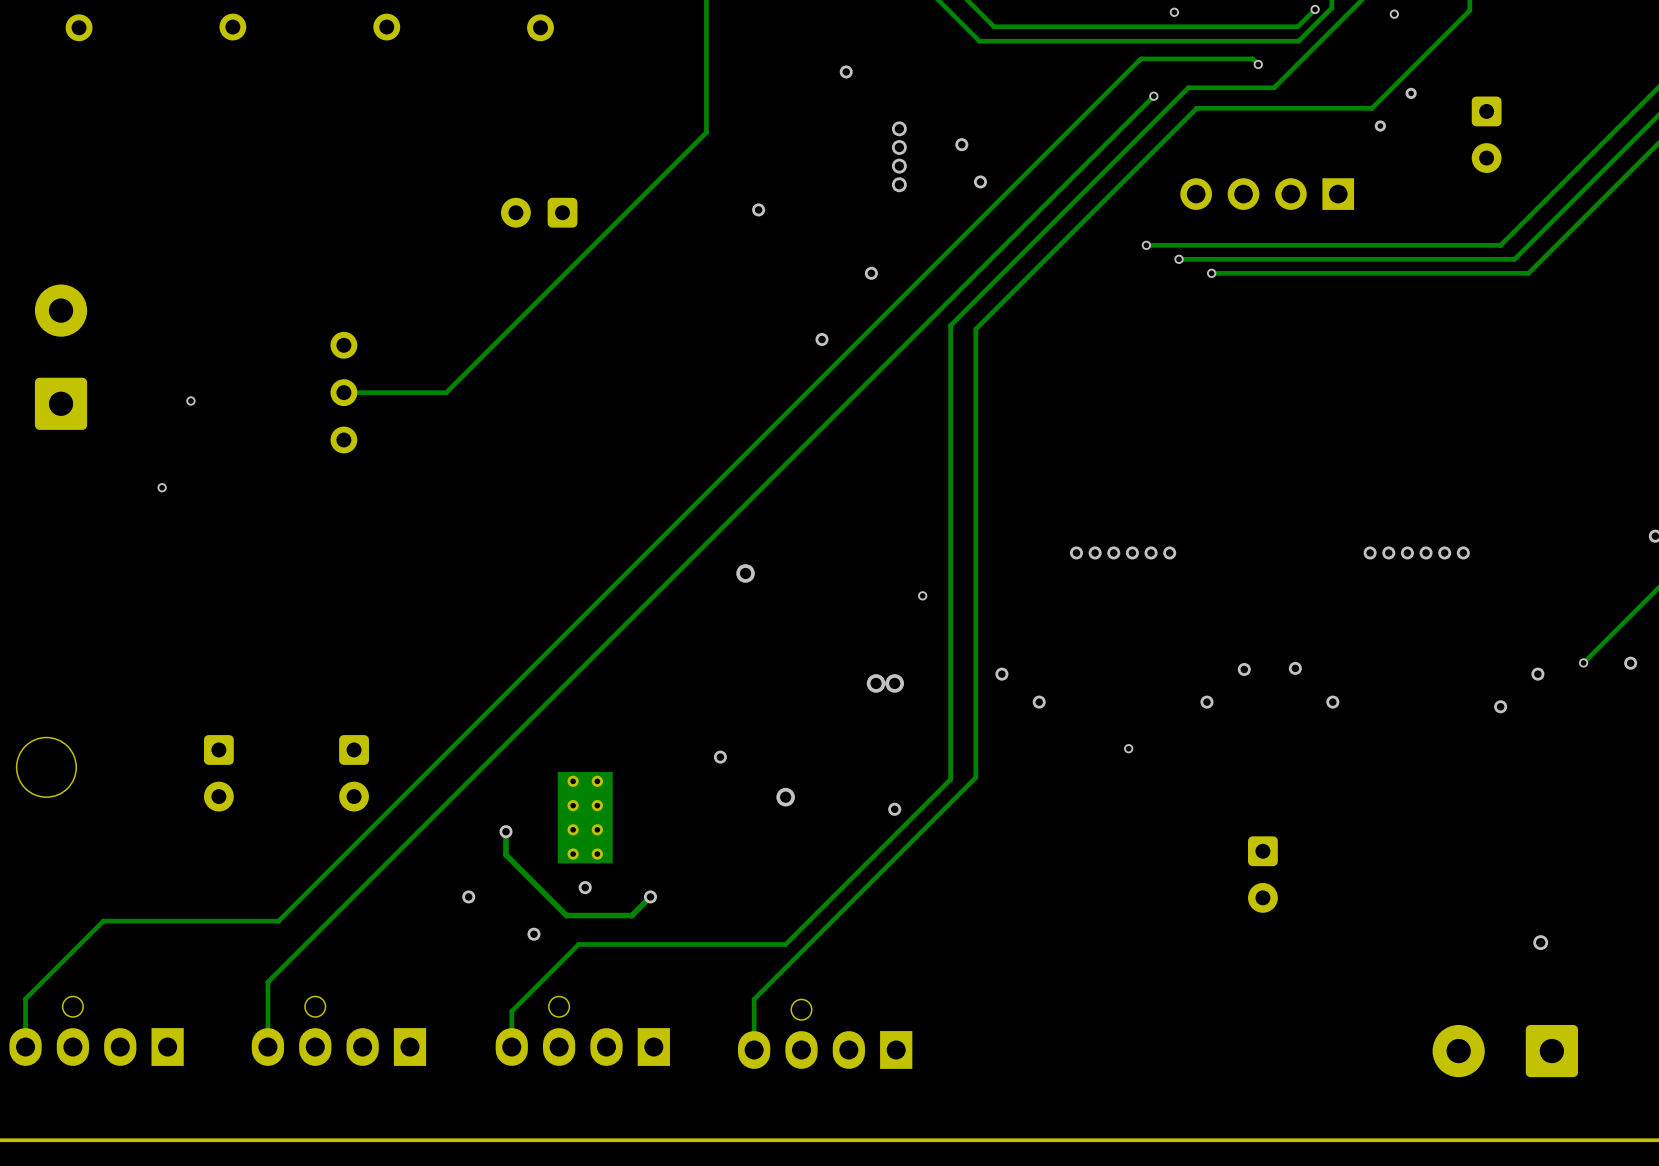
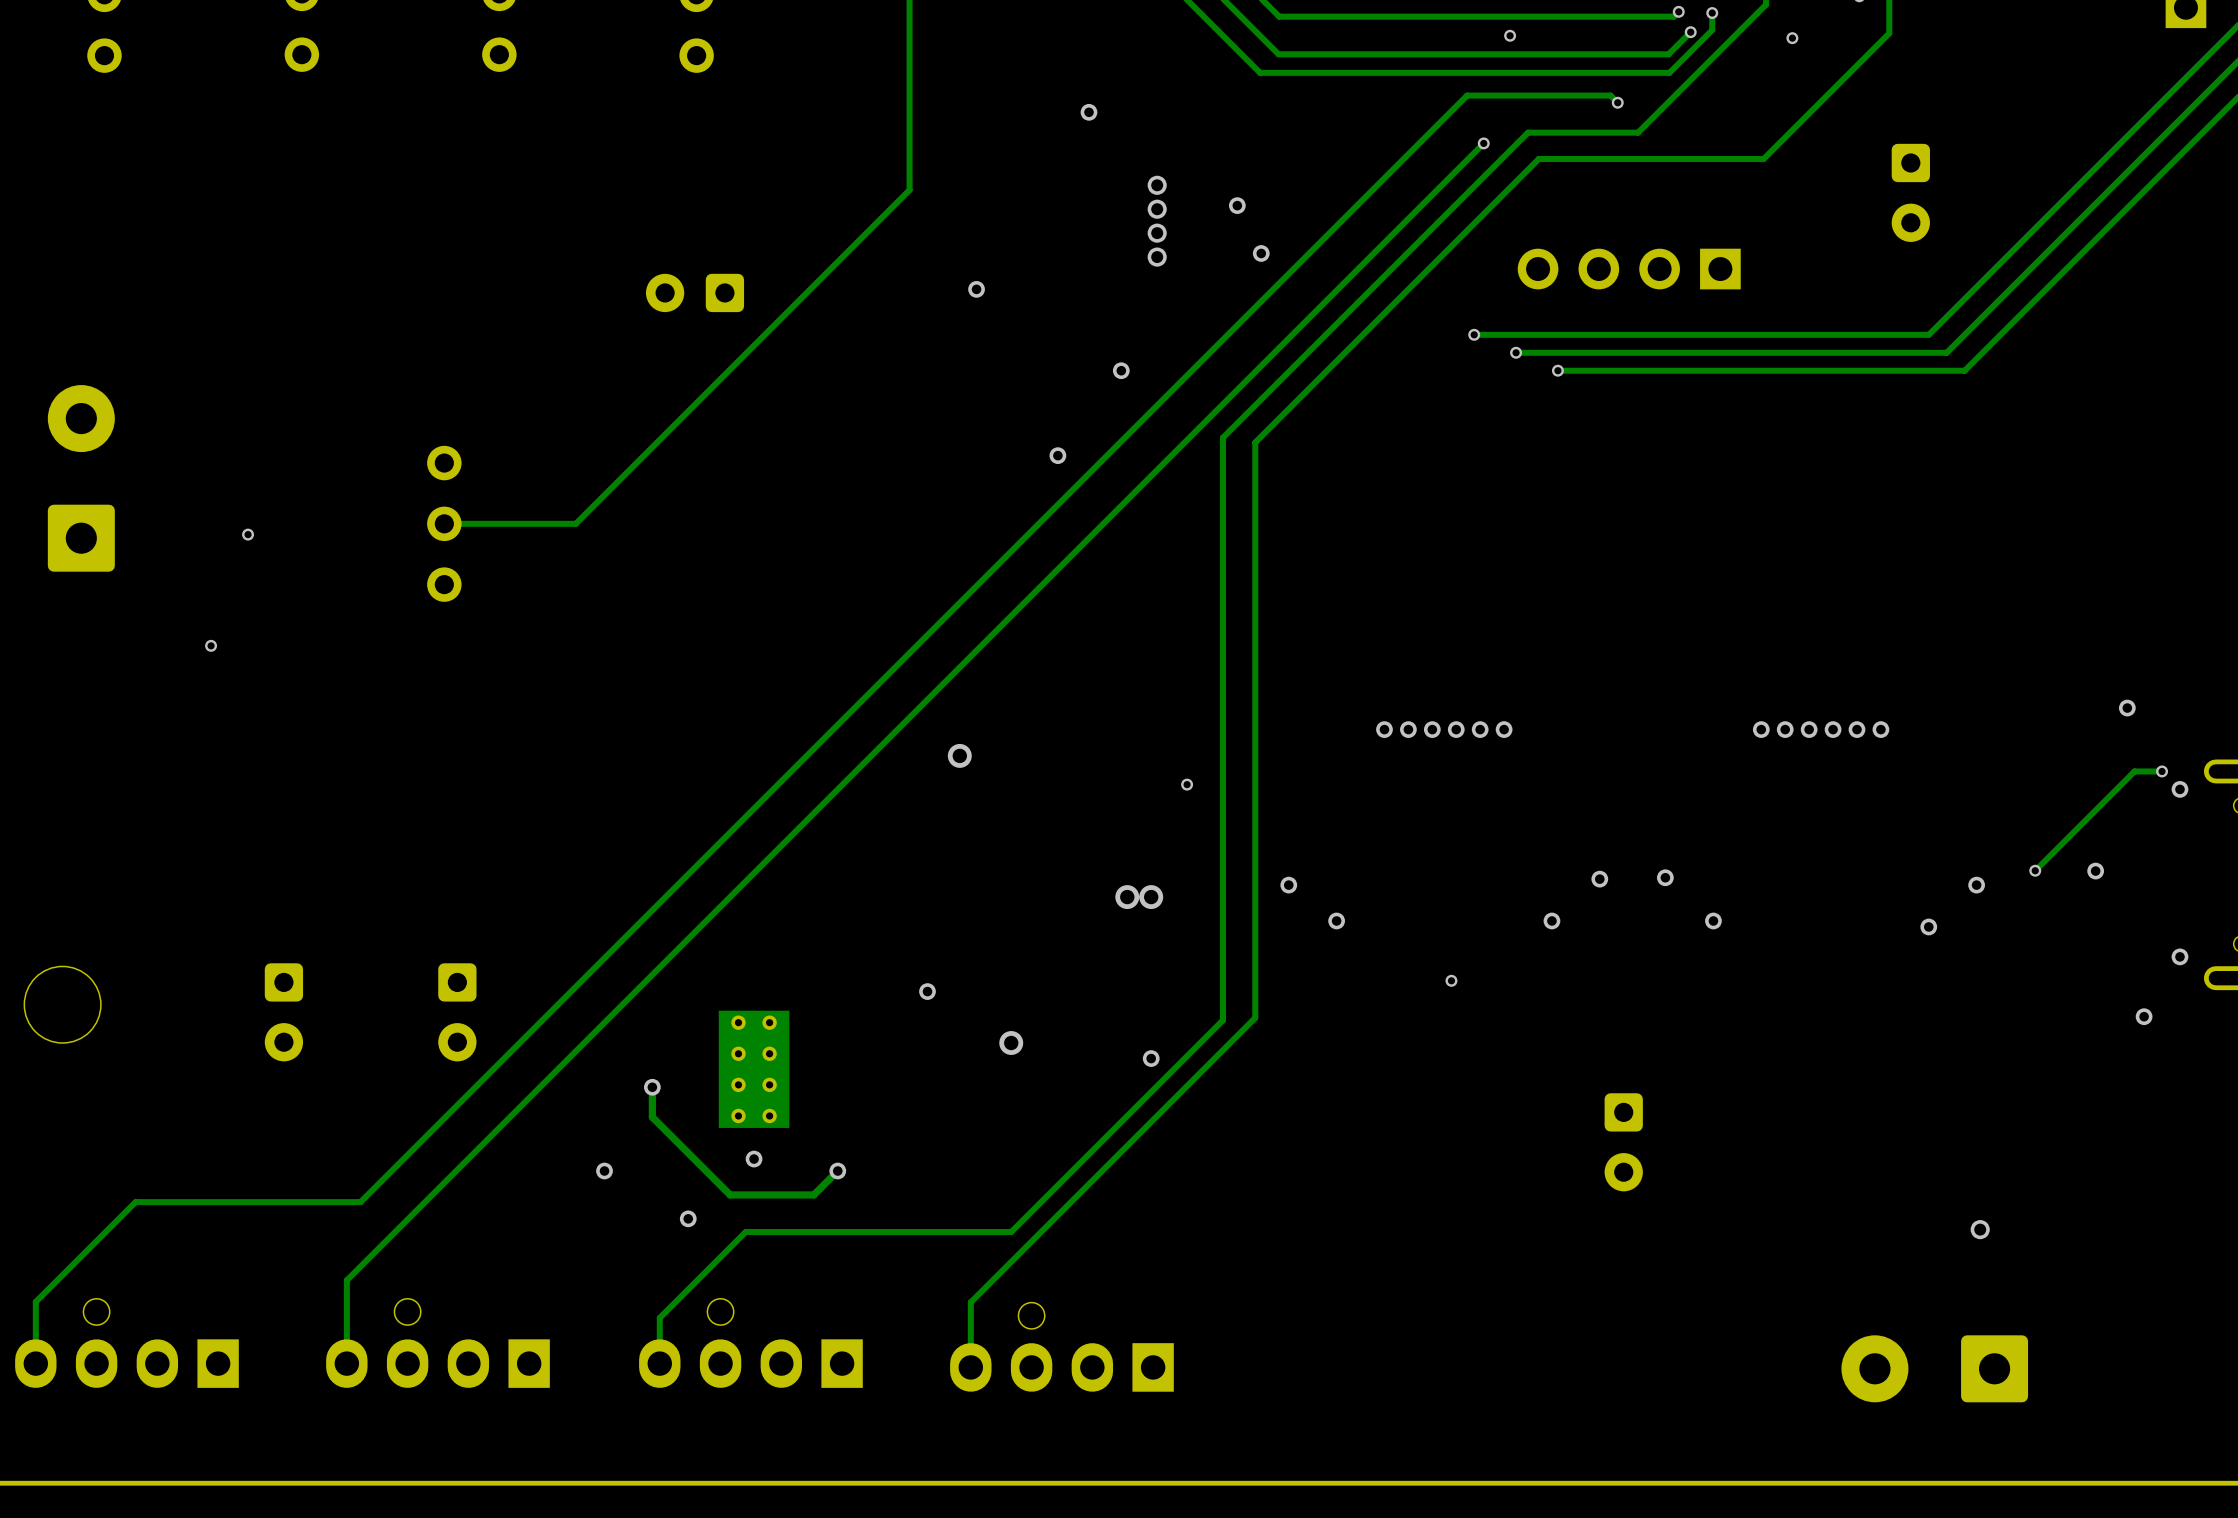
via: (1411, 93) -> none
via: (1380, 126) -> none

